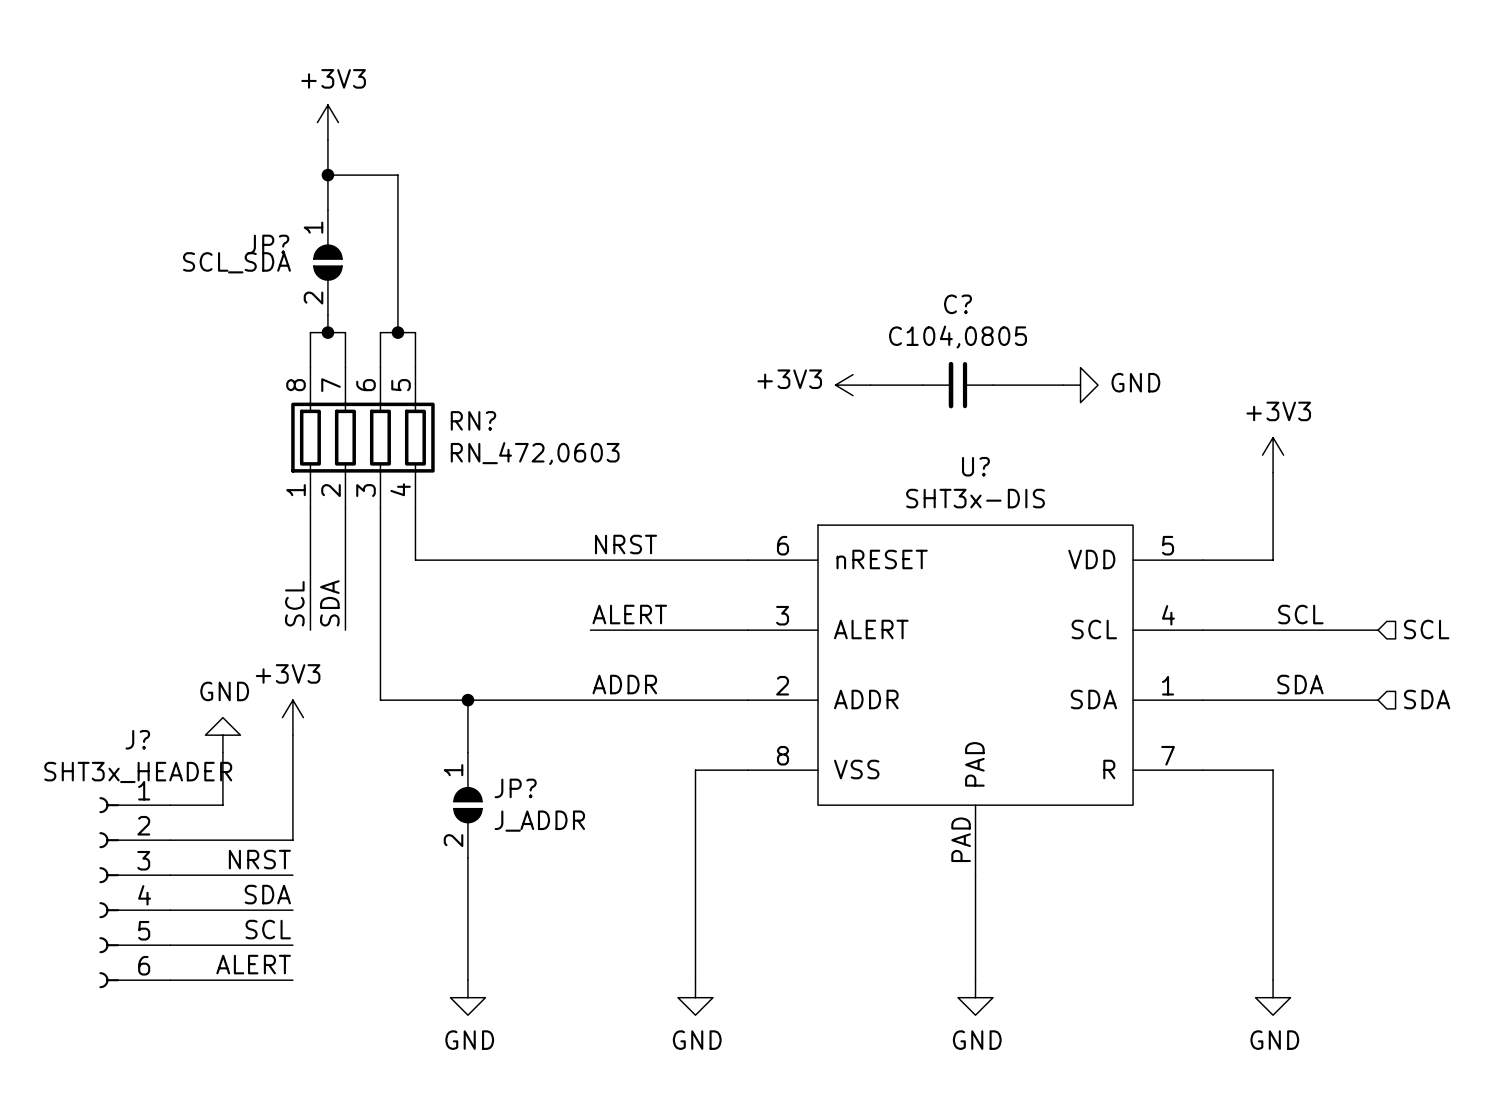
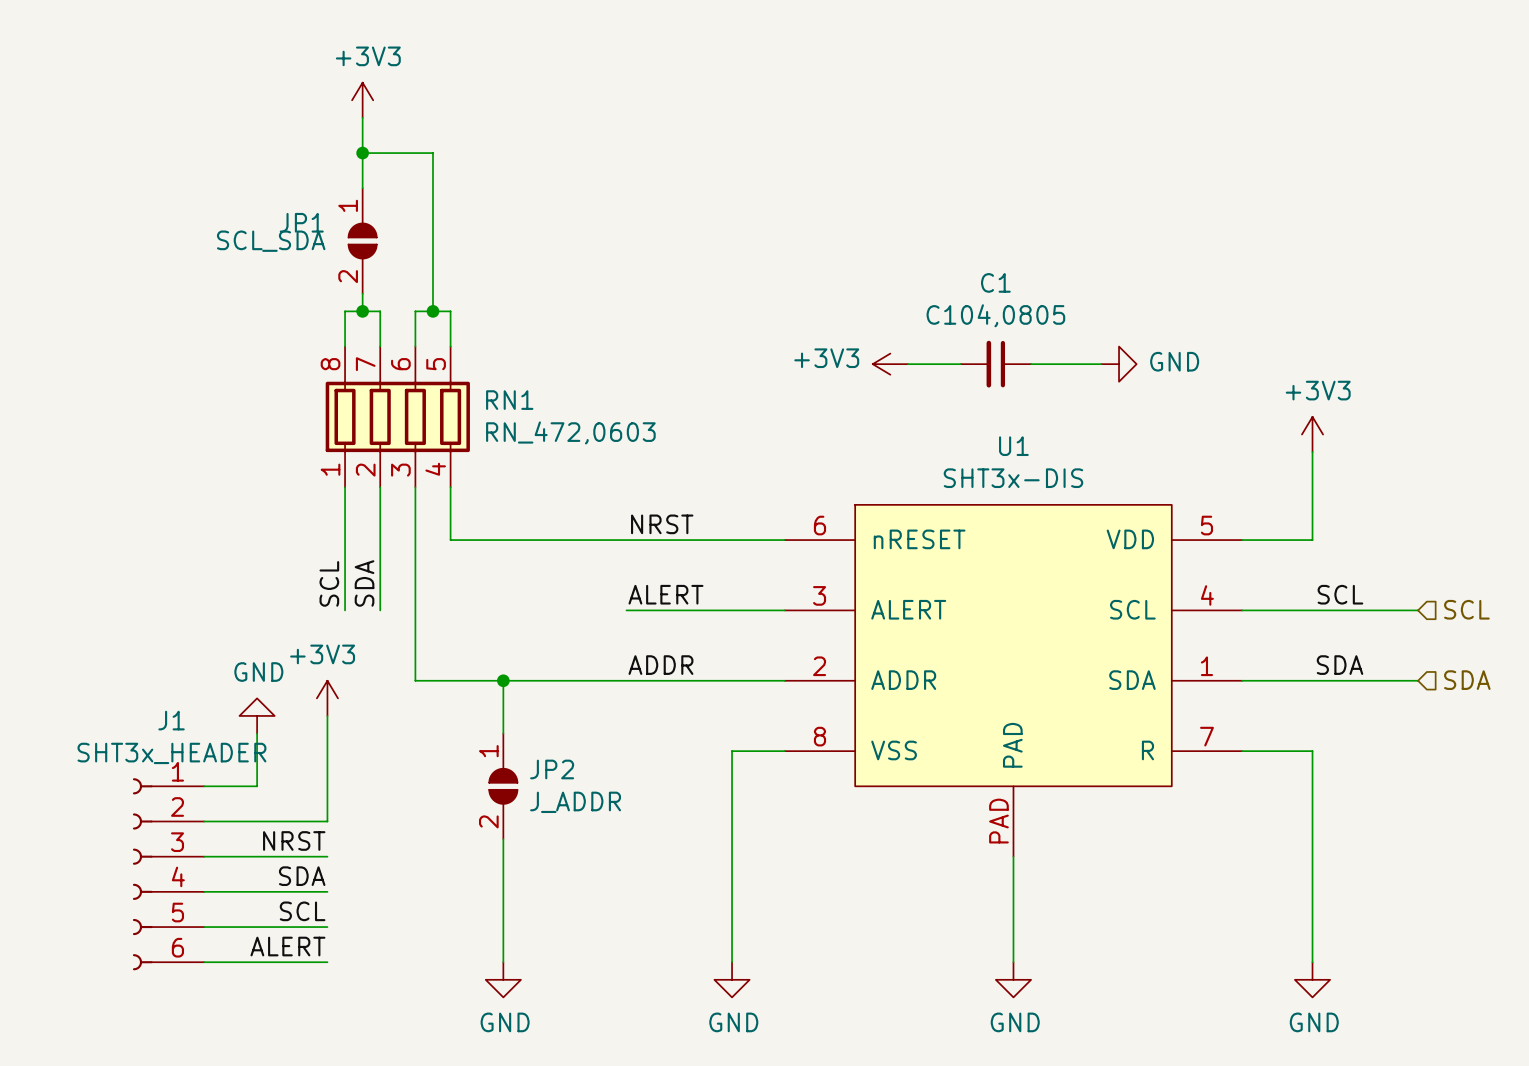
JP? name: JP? (268, 244) -> JP1 (301, 222)
C? name: C? (958, 304) -> C1 (995, 282)
RN? name: RN? (473, 420) -> RN1 (509, 400)
U? name: U? (975, 466) -> U1 (1013, 446)
J? name: J? (137, 739) -> J1 (171, 720)
JP? name: JP? (515, 788) -> JP2 (552, 769)

